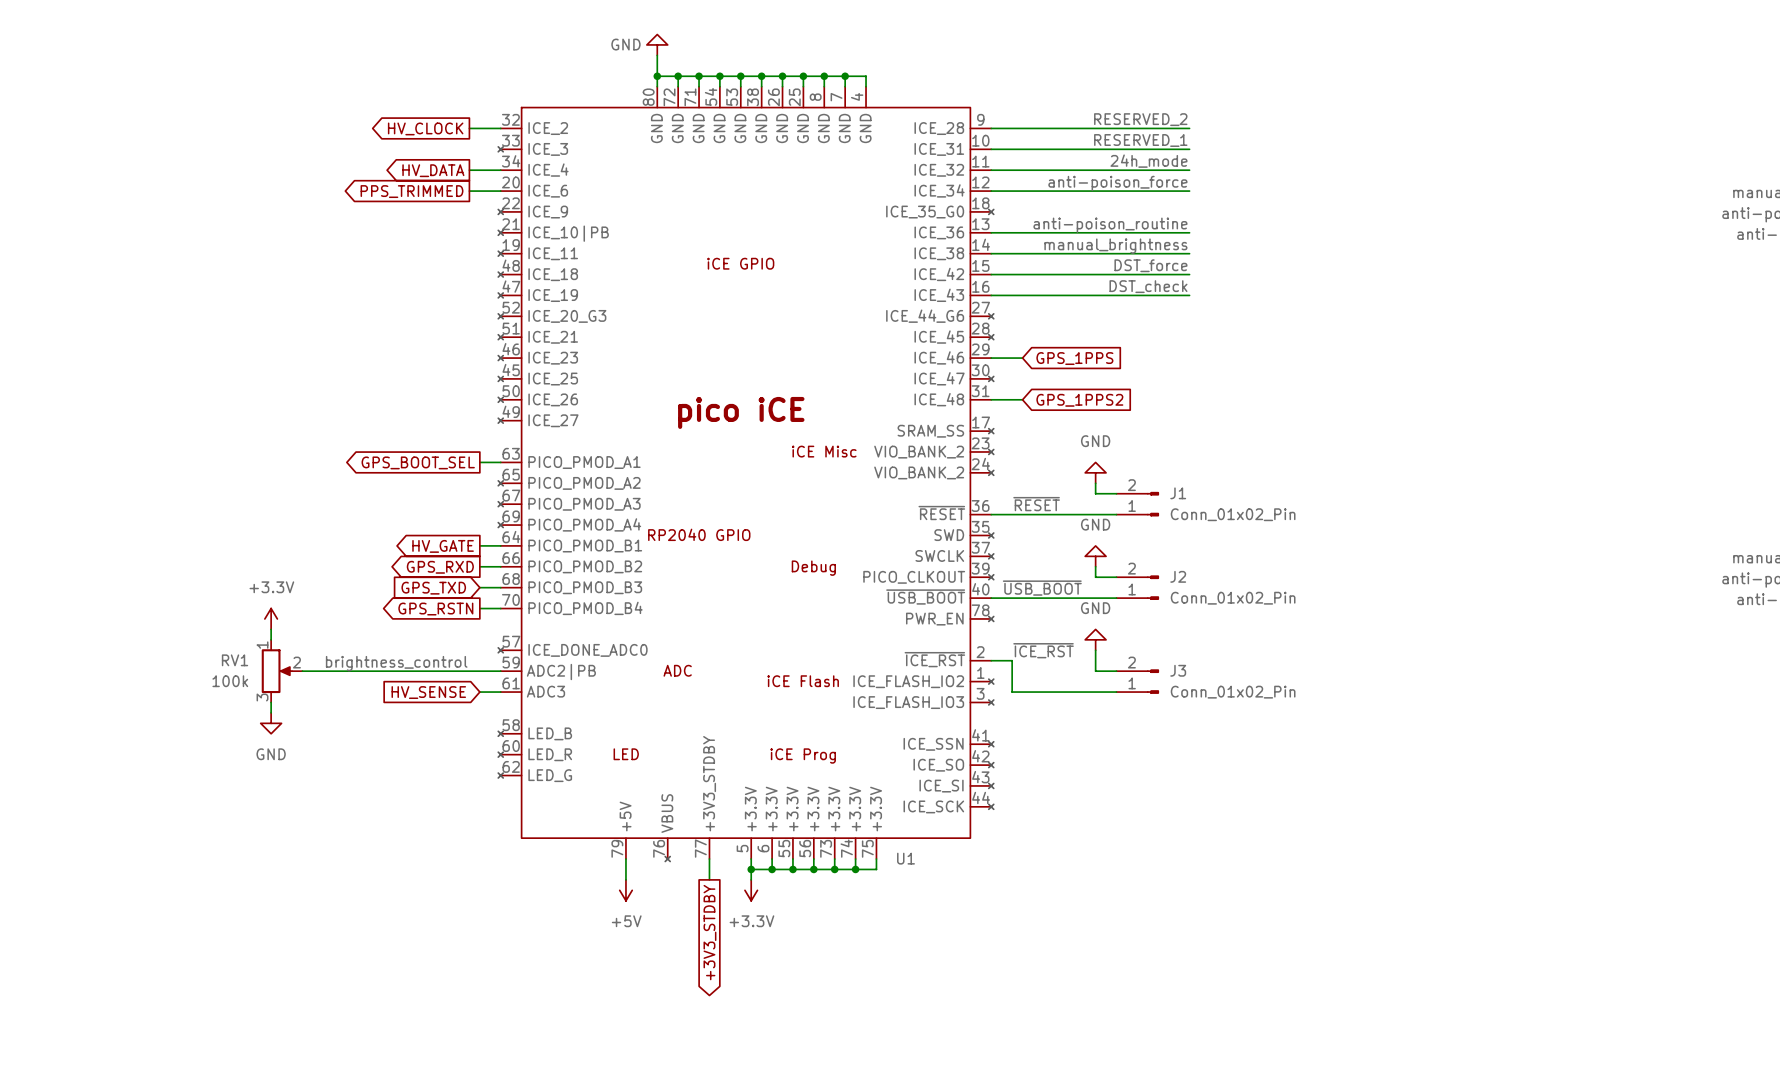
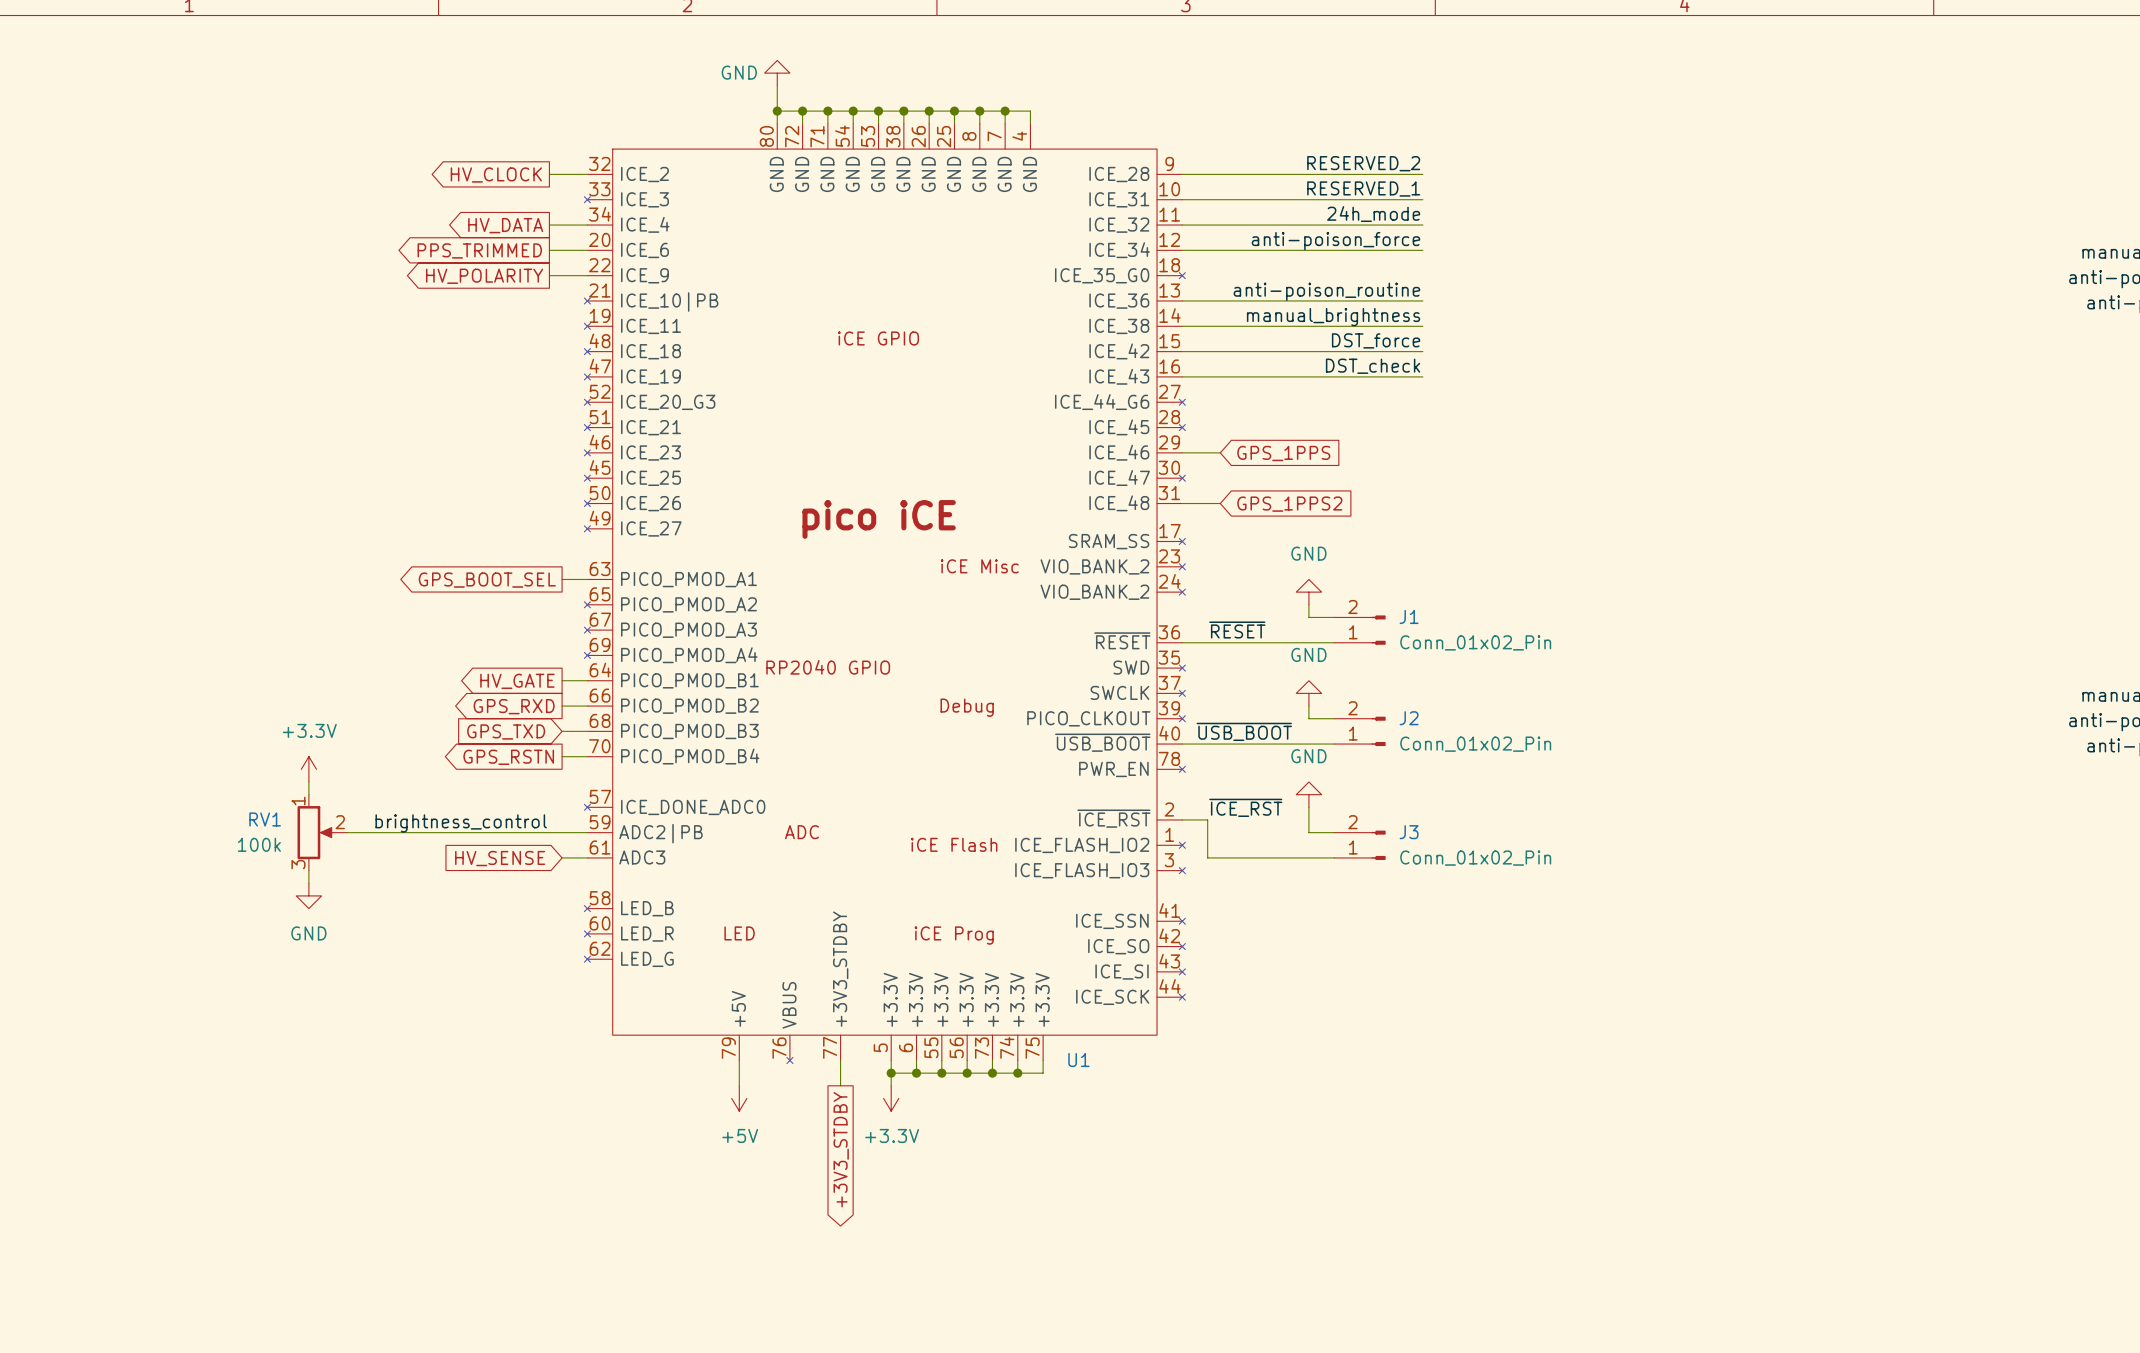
U1 symbol: [498, 86, 994, 862] -> [584, 123, 1186, 1064]
wire: none -> (549, 275) (587, 275)
global label: none -> HV_POLARITY (484, 276)

